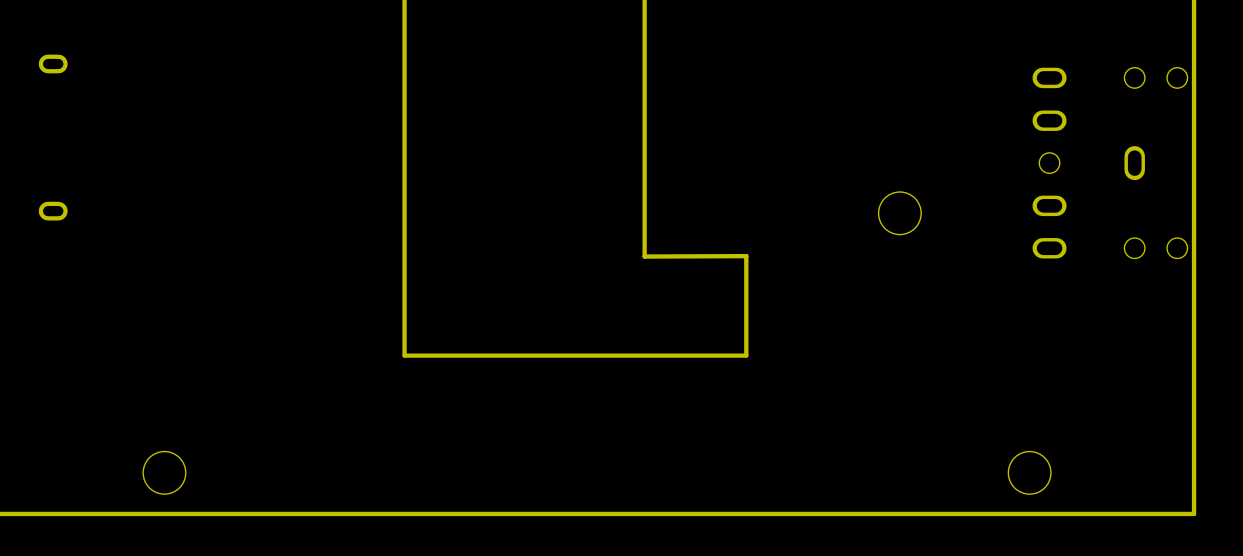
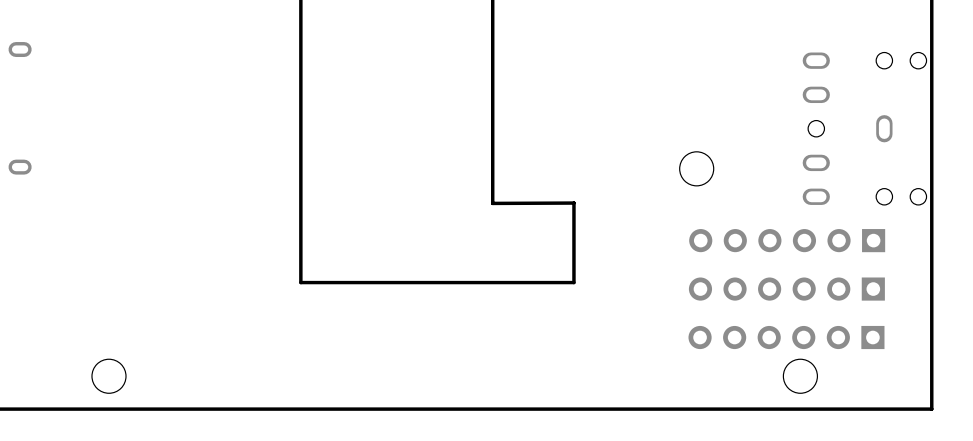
part: none -> (787, 240)
part: none -> (786, 289)
part: none -> (786, 337)

